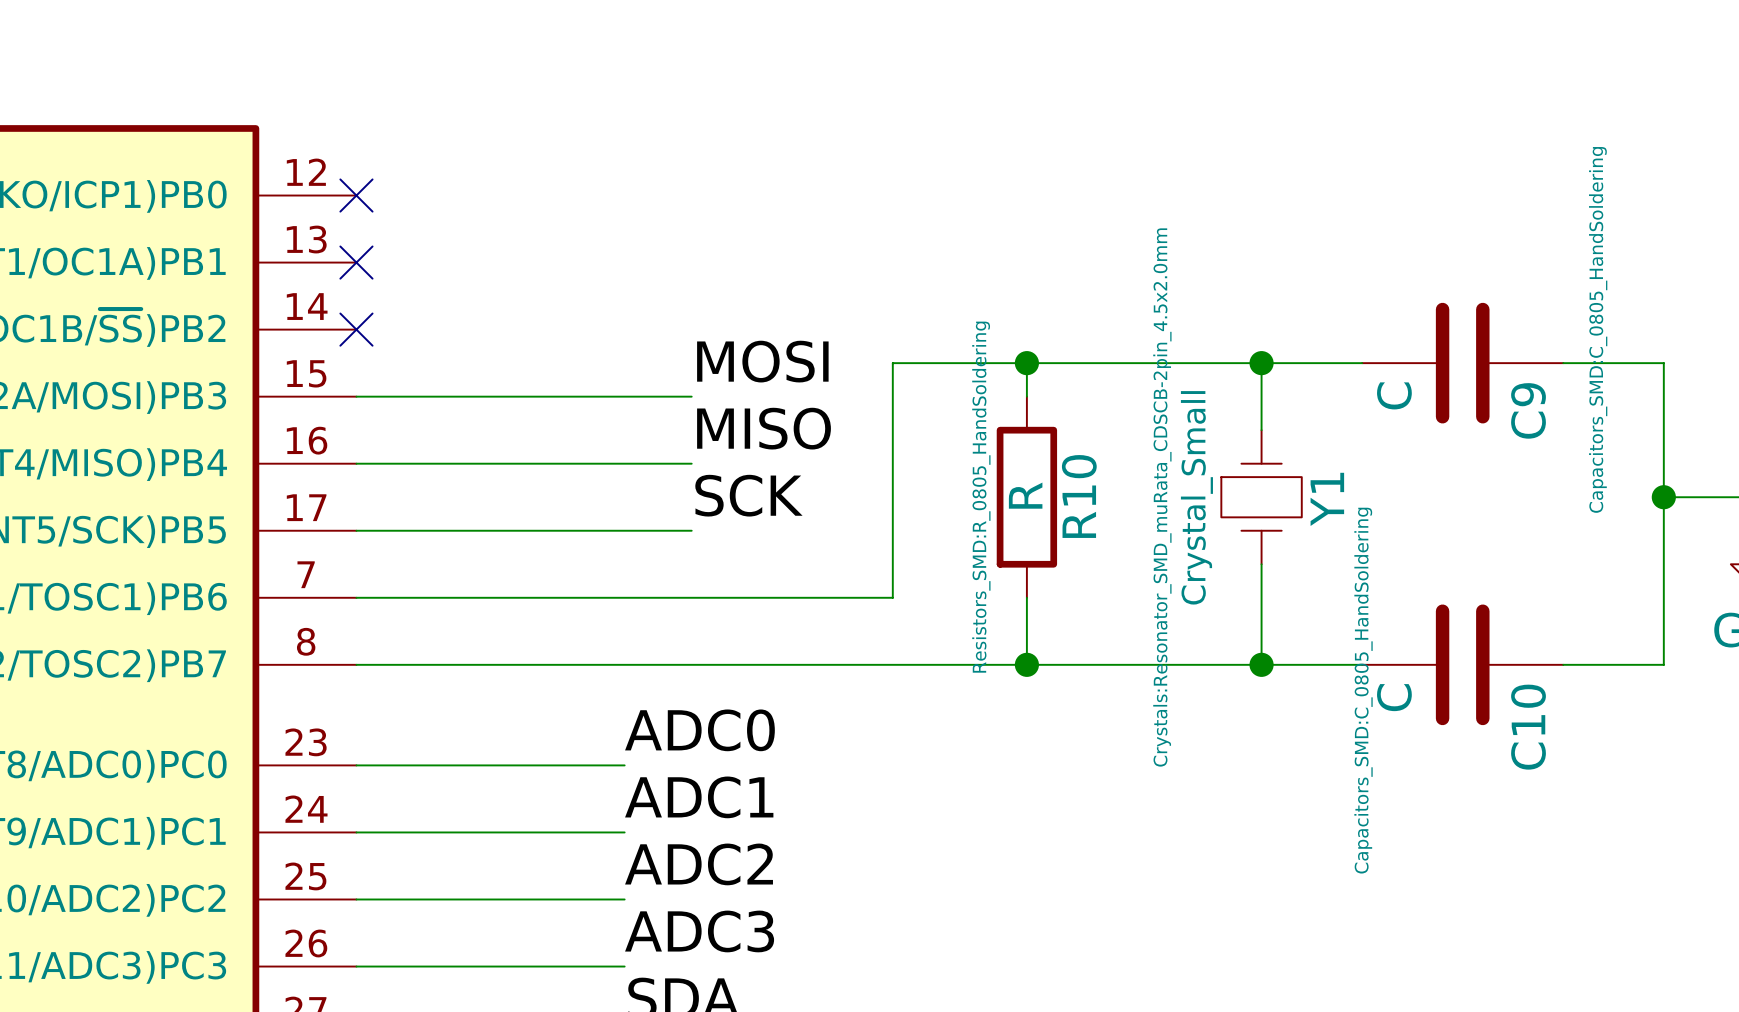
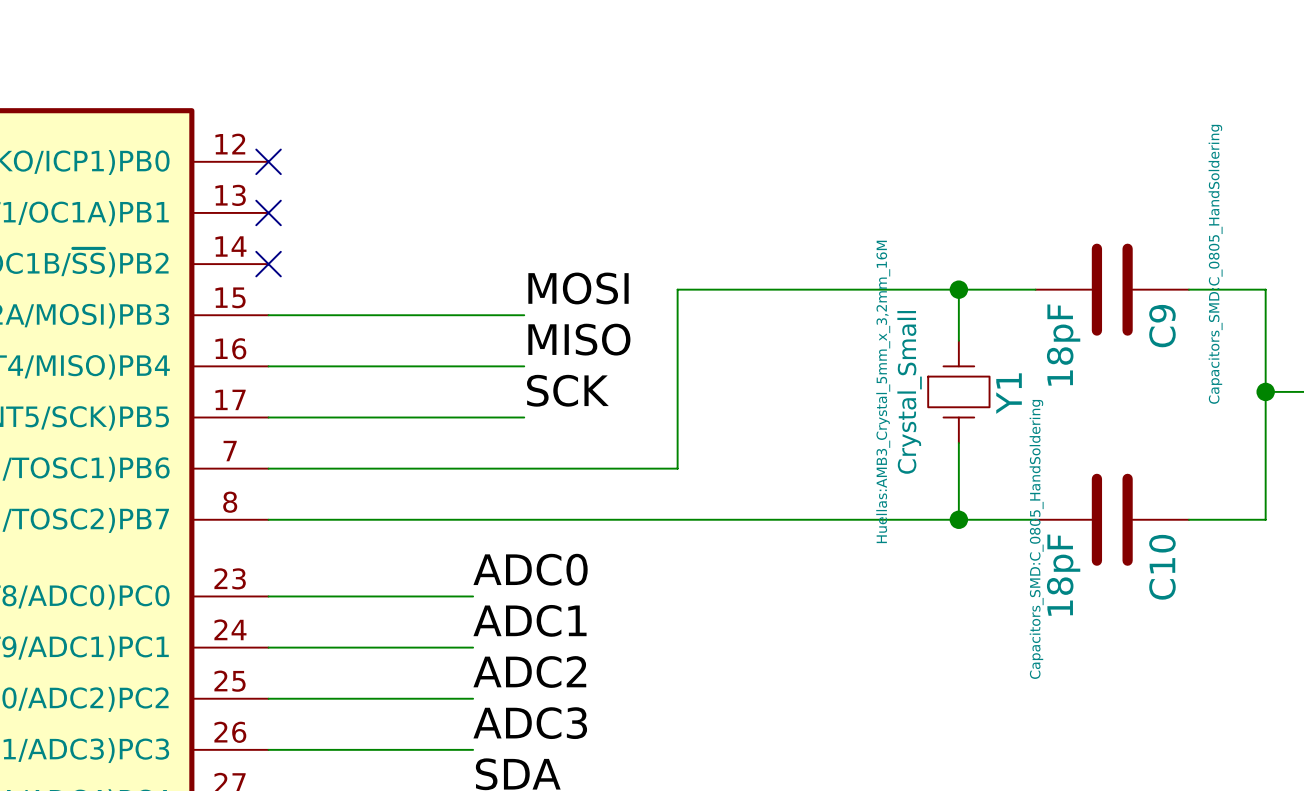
wire: (1026, 363) (1026, 396) -> none
junction: (1026, 363) -> none
C9 value: C (1394, 395) -> 18pF (1063, 345)
R10: R (1026, 497) -> none
Y1 text: Crystals:Resonator_SMD_muRata_CDSCB-2pin_4.5x2.0mm (1162, 497) -> Huellas:AMB3_Crystal_5mm_x_3,2mm_16M (883, 391)
wire: (1026, 597) (1026, 664) -> none
junction: (1026, 664) -> none
C10 value: C (1394, 697) -> 18pF (1063, 575)

